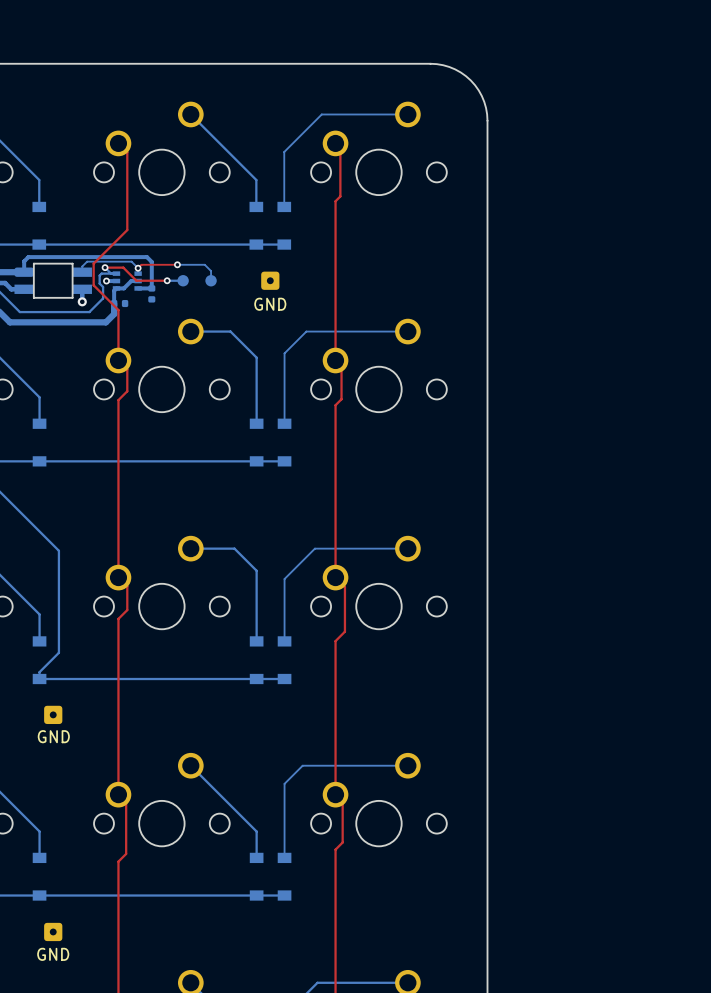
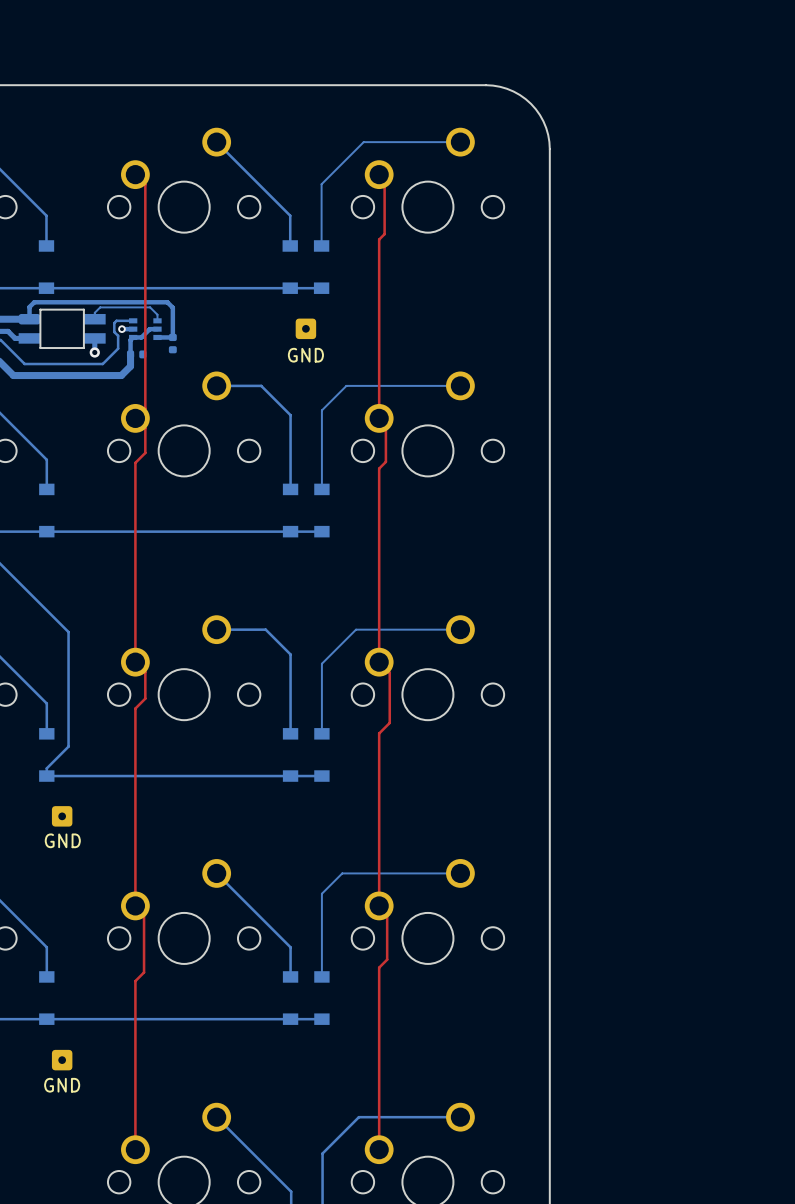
top track: (127, 230) (93, 263) (93, 285) (118, 310) (118, 360) -> (145, 271) (145, 408) (135, 418)
top track: (177, 264) (141, 264) (138, 268) -> none
bottom track: (177, 264) (204, 264) (211, 271) (211, 280) -> none
via: (177, 264) -> none
top track: (105, 267) (123, 267) (136, 280) (167, 280) -> none
bottom track: (105, 267) (111, 273) -> none
via: (105, 267) -> none
via: (138, 268) -> none
bottom track: (167, 280) (183, 280) -> none
via: (167, 280) -> none
part: (183, 280) -> none
part: (211, 280) -> none

